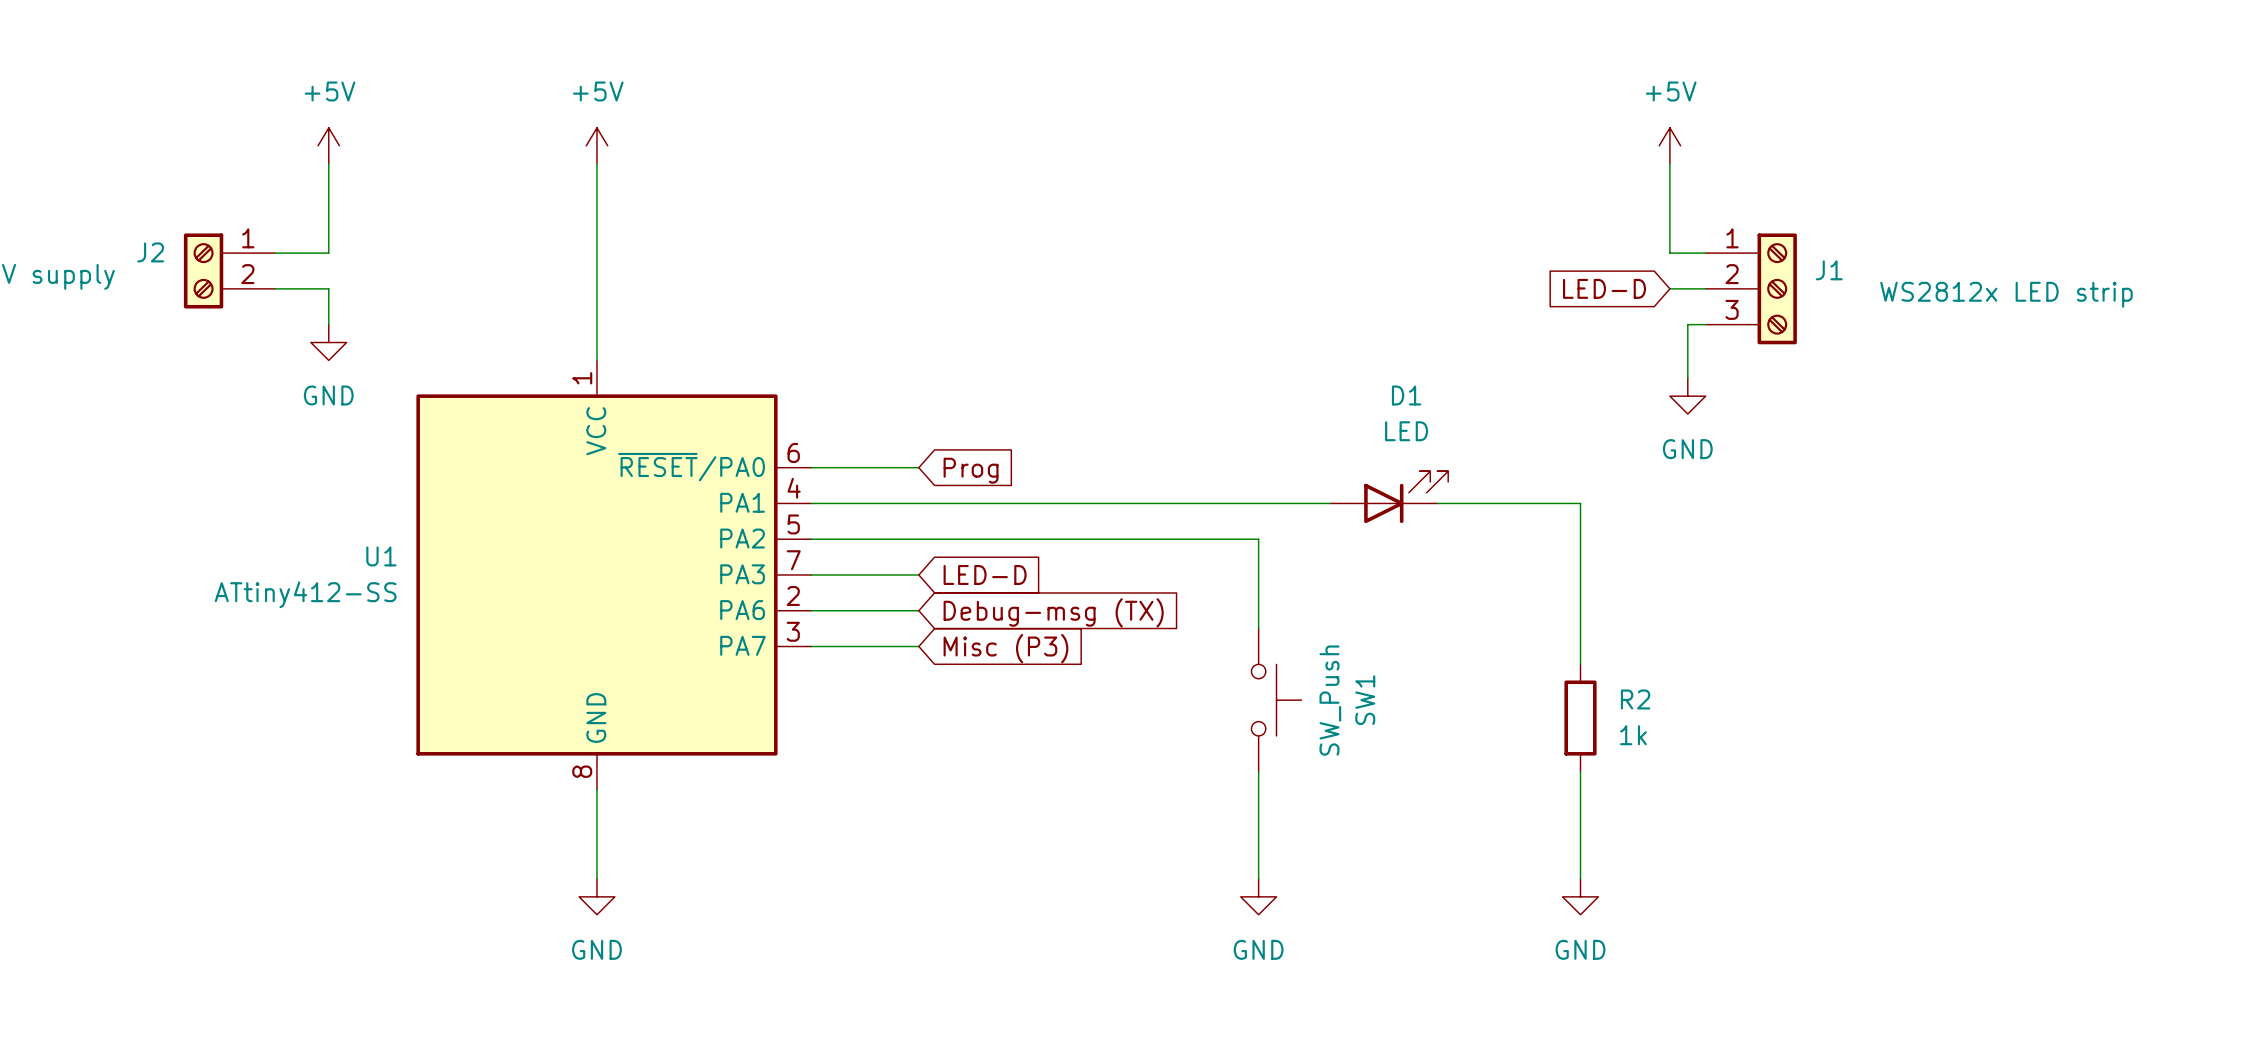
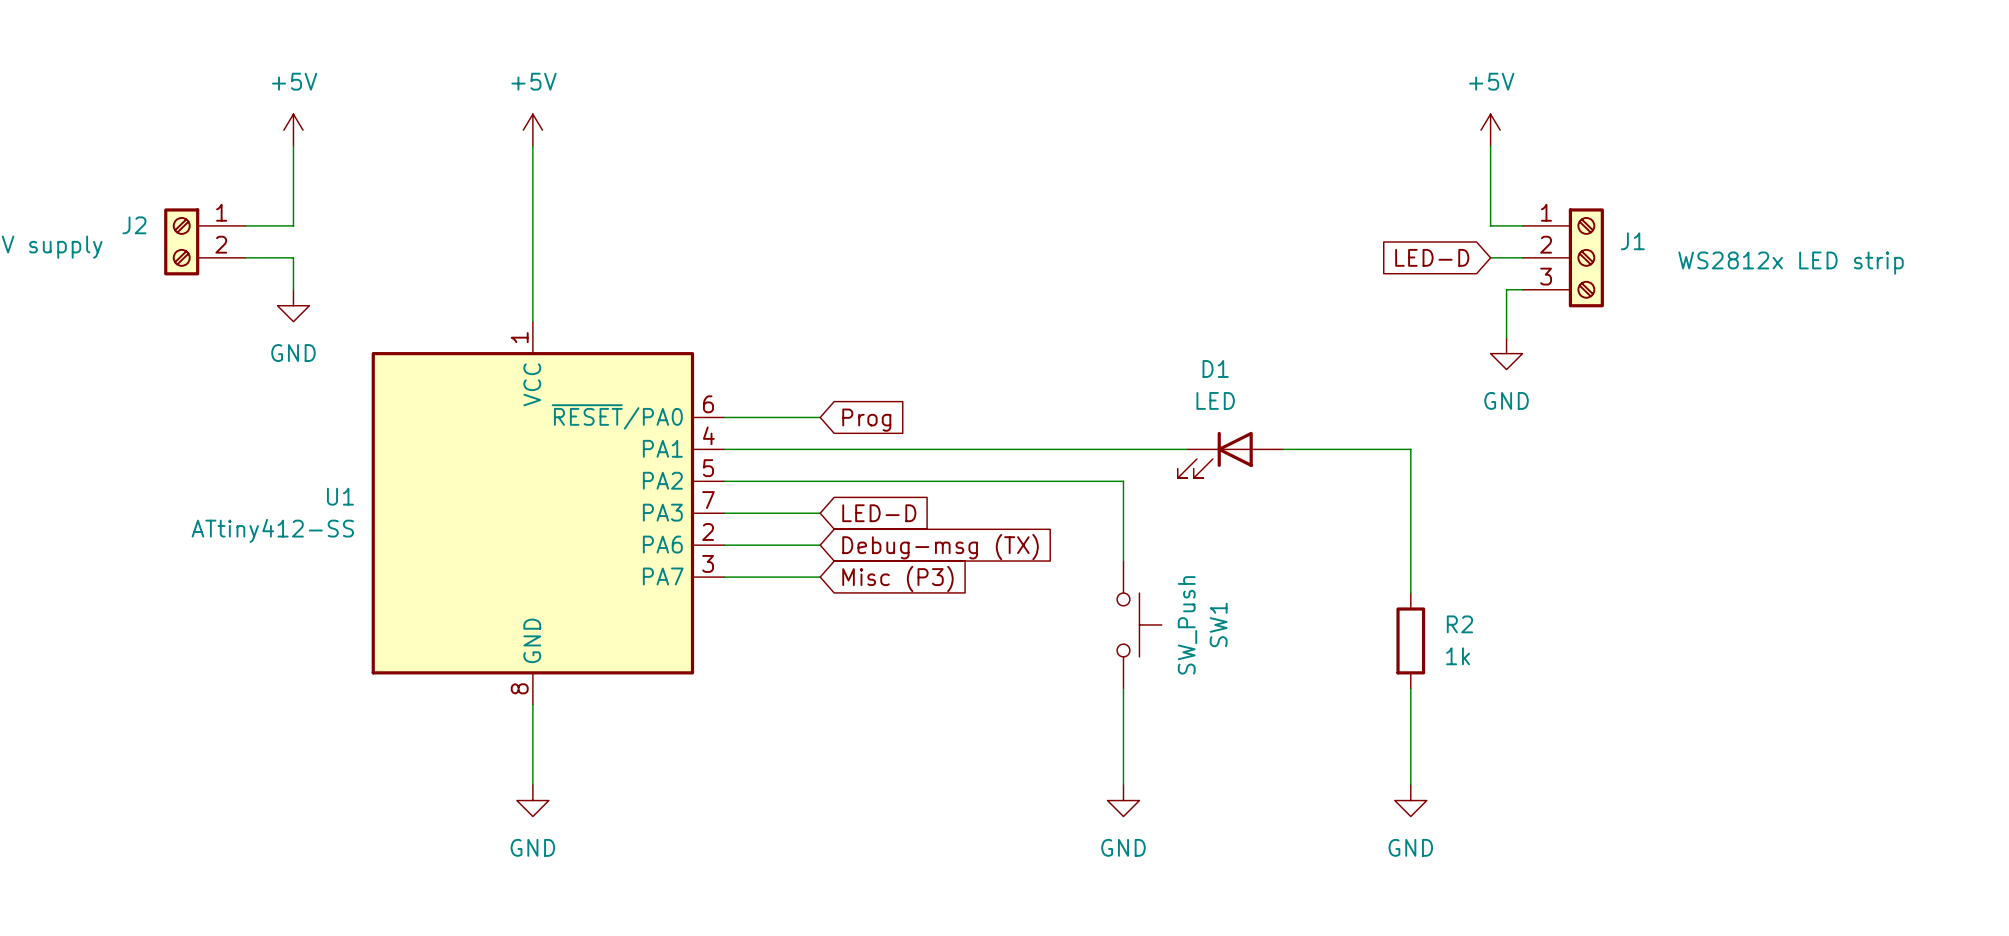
D1 name position: D1 (1406, 395) -> D1 (1215, 368)
D1 value position: LED (1406, 431) -> LED (1215, 400)
D1 rotation: 0° (1406, 497) -> 180° (1215, 454)

